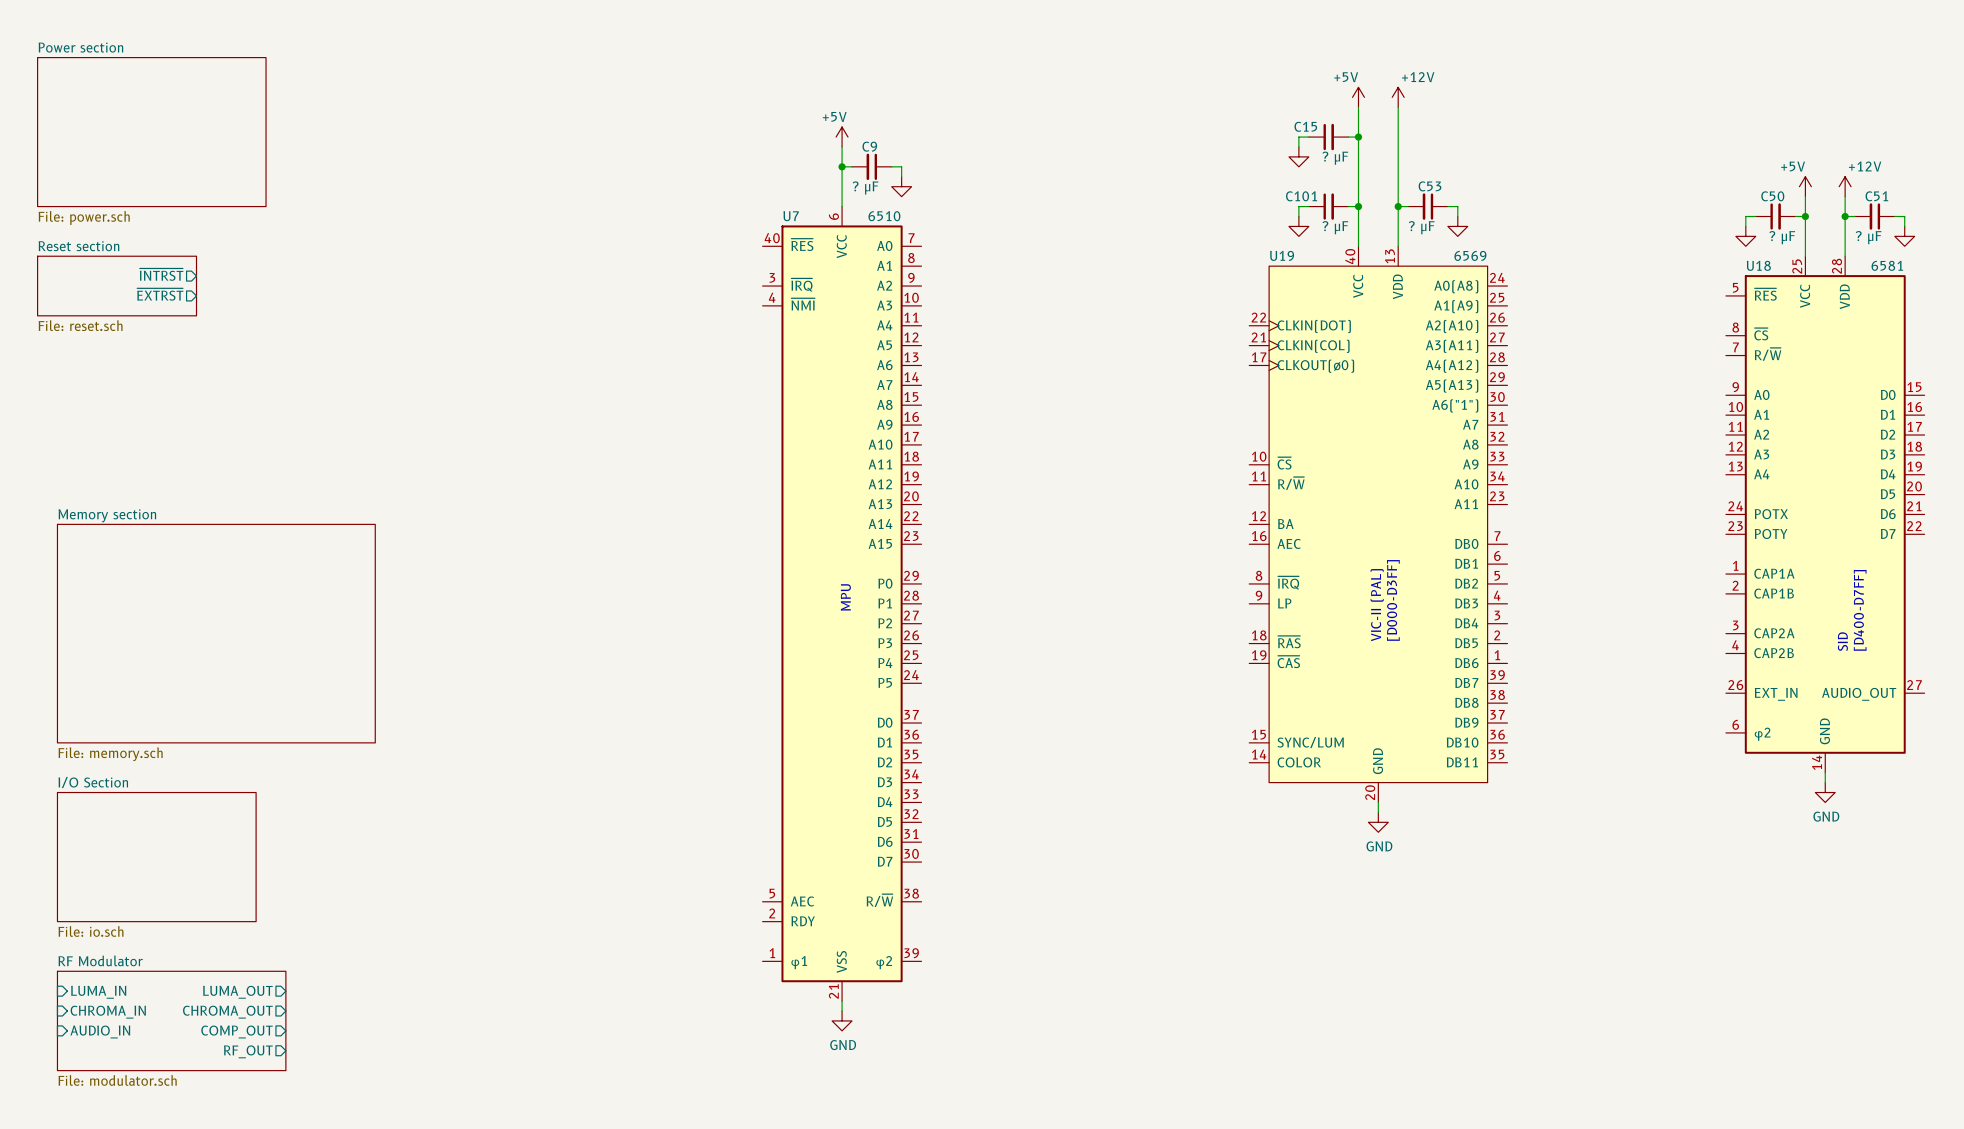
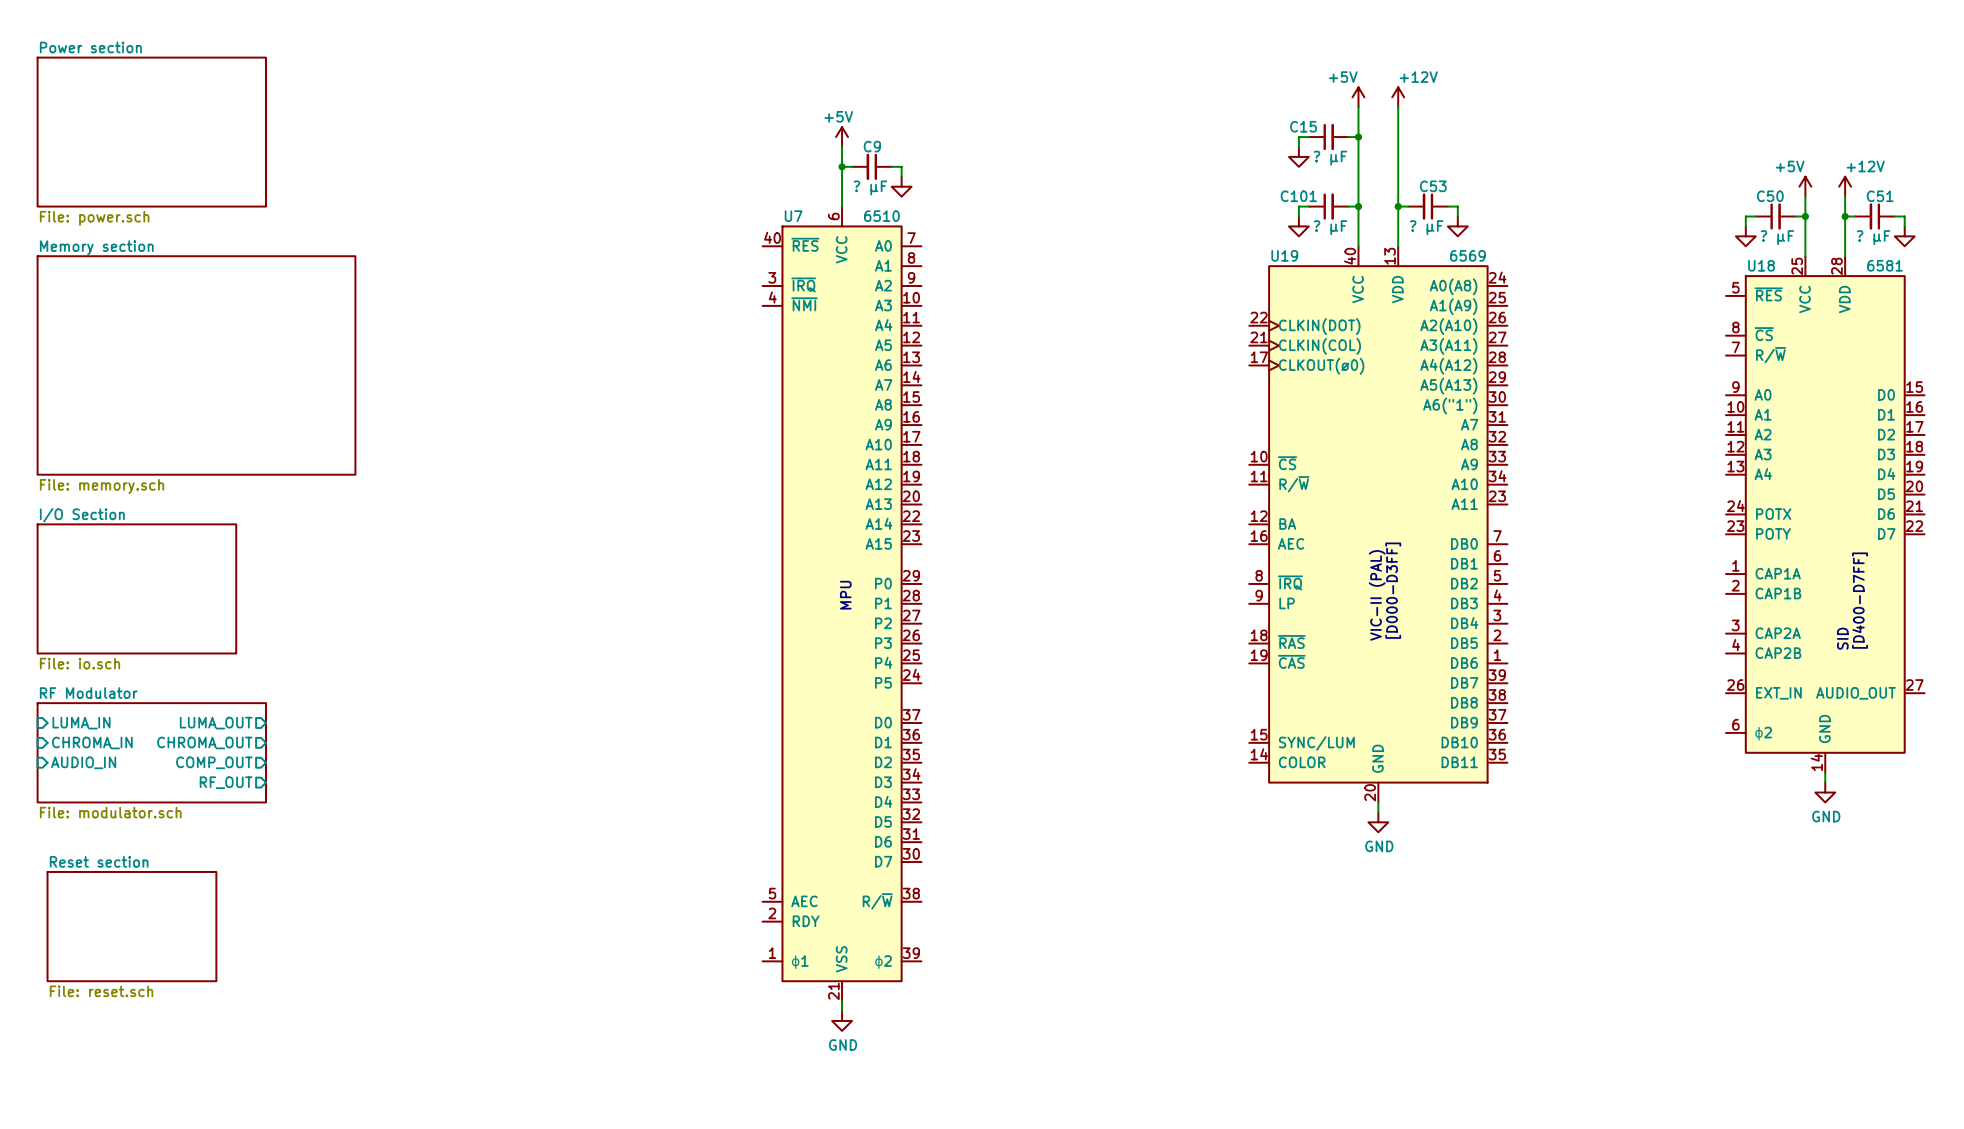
sheet pin: ~{INTRST} (161, 274) -> none
sheet Reset section: File: reset.sch (117, 286) -> none
sheet pin: ~{EXTRST} (160, 294) -> none
sheet Memory section: none -> File: memory.sch (196, 365)
sheet I/O Section: none -> File: io.sch (136, 588)
sheet Memory section: File: memory.sch (216, 633) -> none
sheet pin: none -> LUMA_IN (81, 723)
sheet pin: none -> LUMA_OUT (216, 723)
sheet pin: none -> CHROMA_IN (92, 742)
sheet pin: none -> CHROMA_OUT (204, 742)
sheet RF Modulator: none -> File: modulator.sch (151, 752)
sheet pin: none -> AUDIO_IN (83, 762)
sheet pin: none -> COMP_OUT (214, 762)
sheet pin: none -> RF_OUT (226, 782)
sheet I/O Section: File: io.sch (156, 857) -> none
sheet Reset section: none -> File: reset.sch (131, 926)
sheet pin: LUMA_IN (98, 992) -> none
sheet pin: LUMA_OUT (237, 992) -> none
sheet pin: CHROMA_IN (108, 1012) -> none
sheet pin: CHROMA_OUT (227, 1012) -> none
sheet RF Modulator: File: modulator.sch (171, 1020) -> none
sheet pin: AUDIO_IN (100, 1032) -> none
sheet pin: COMP_OUT (237, 1032) -> none
sheet pin: RF_OUT (248, 1051) -> none

